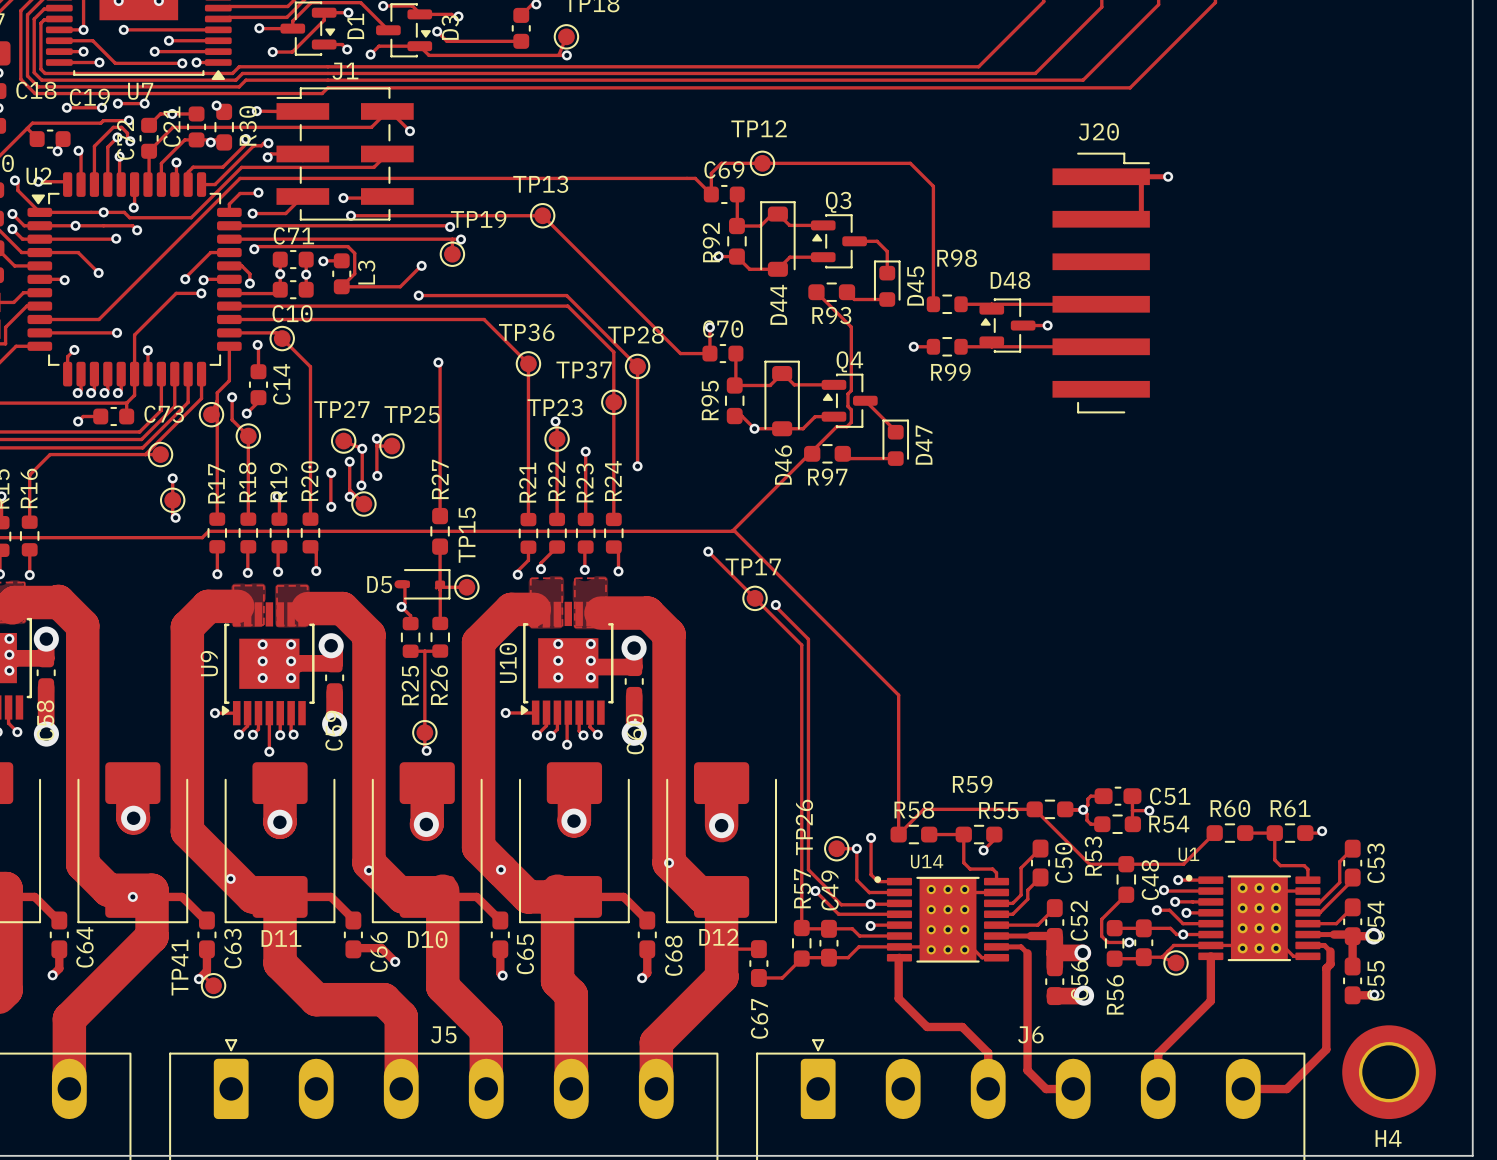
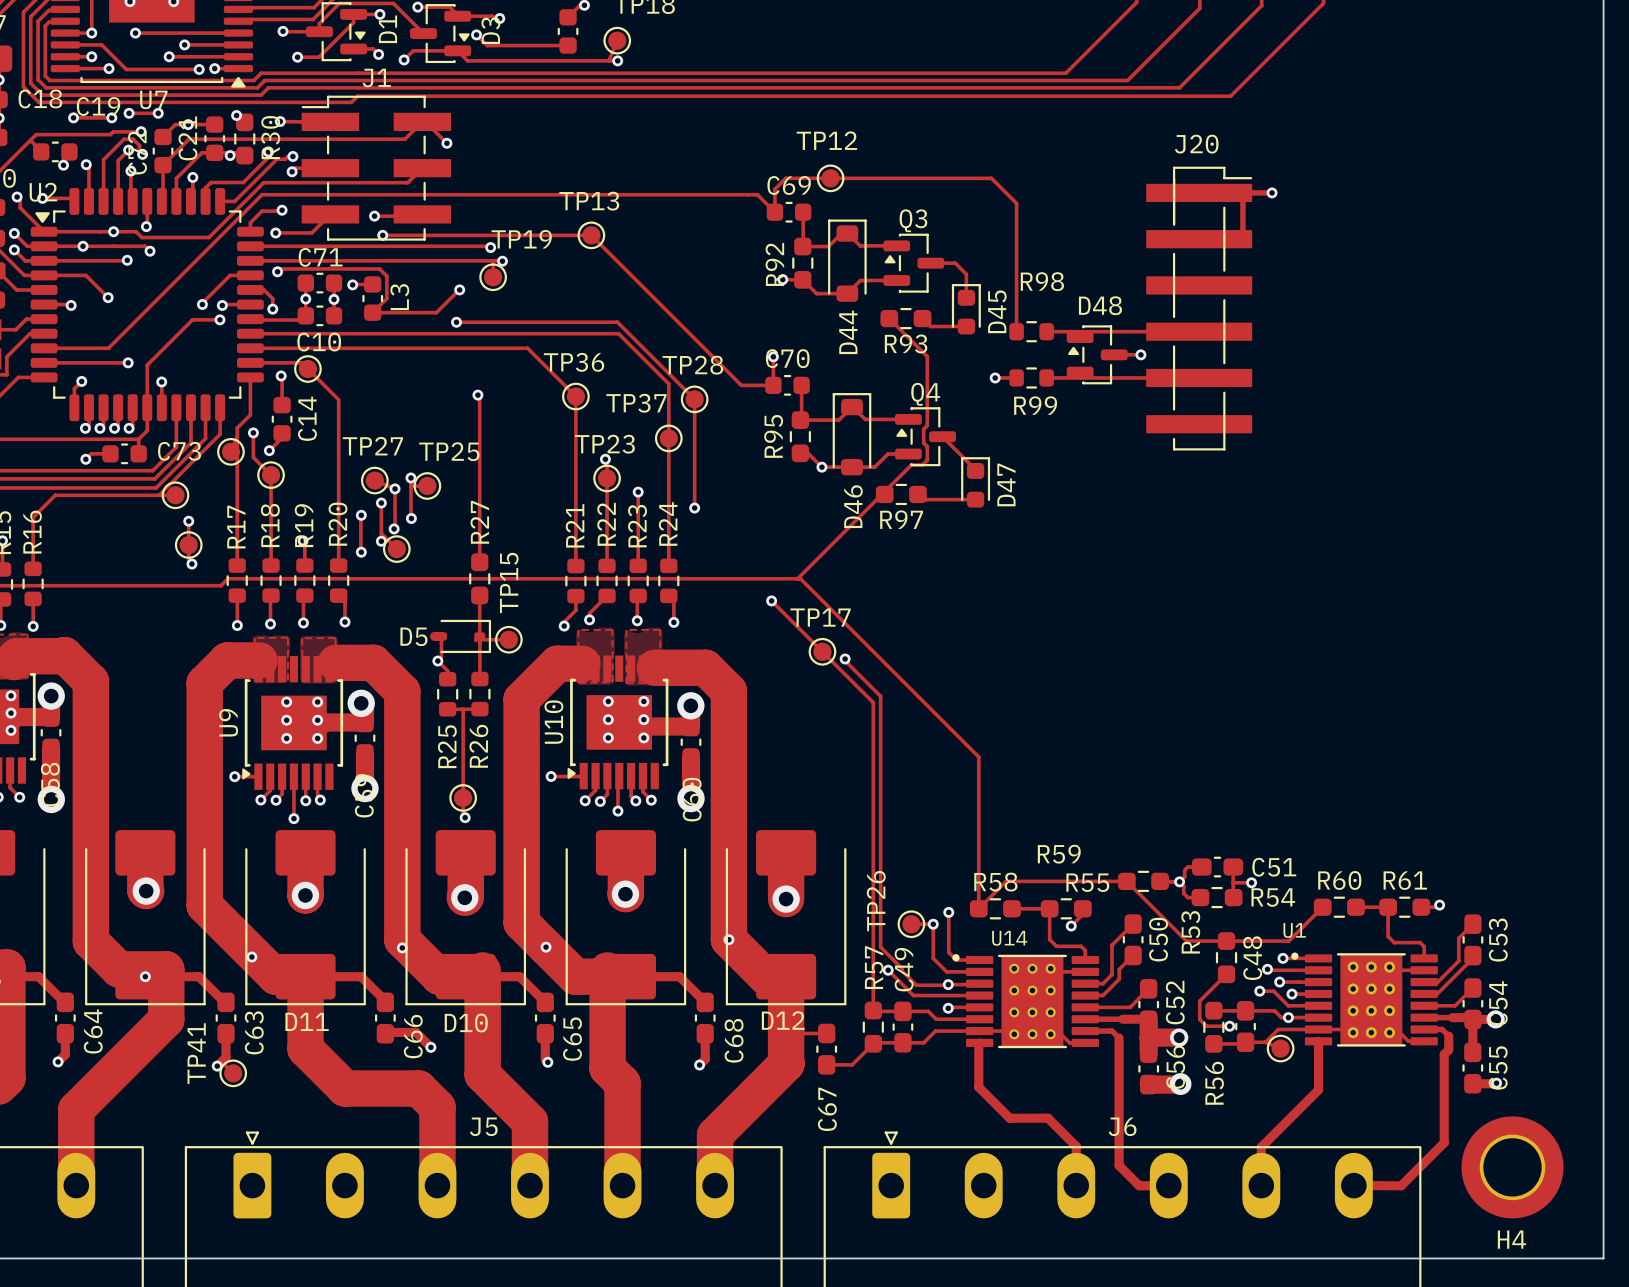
J20 footprint: [1052, 152, 1150, 414] -> [1146, 166, 1253, 451]

